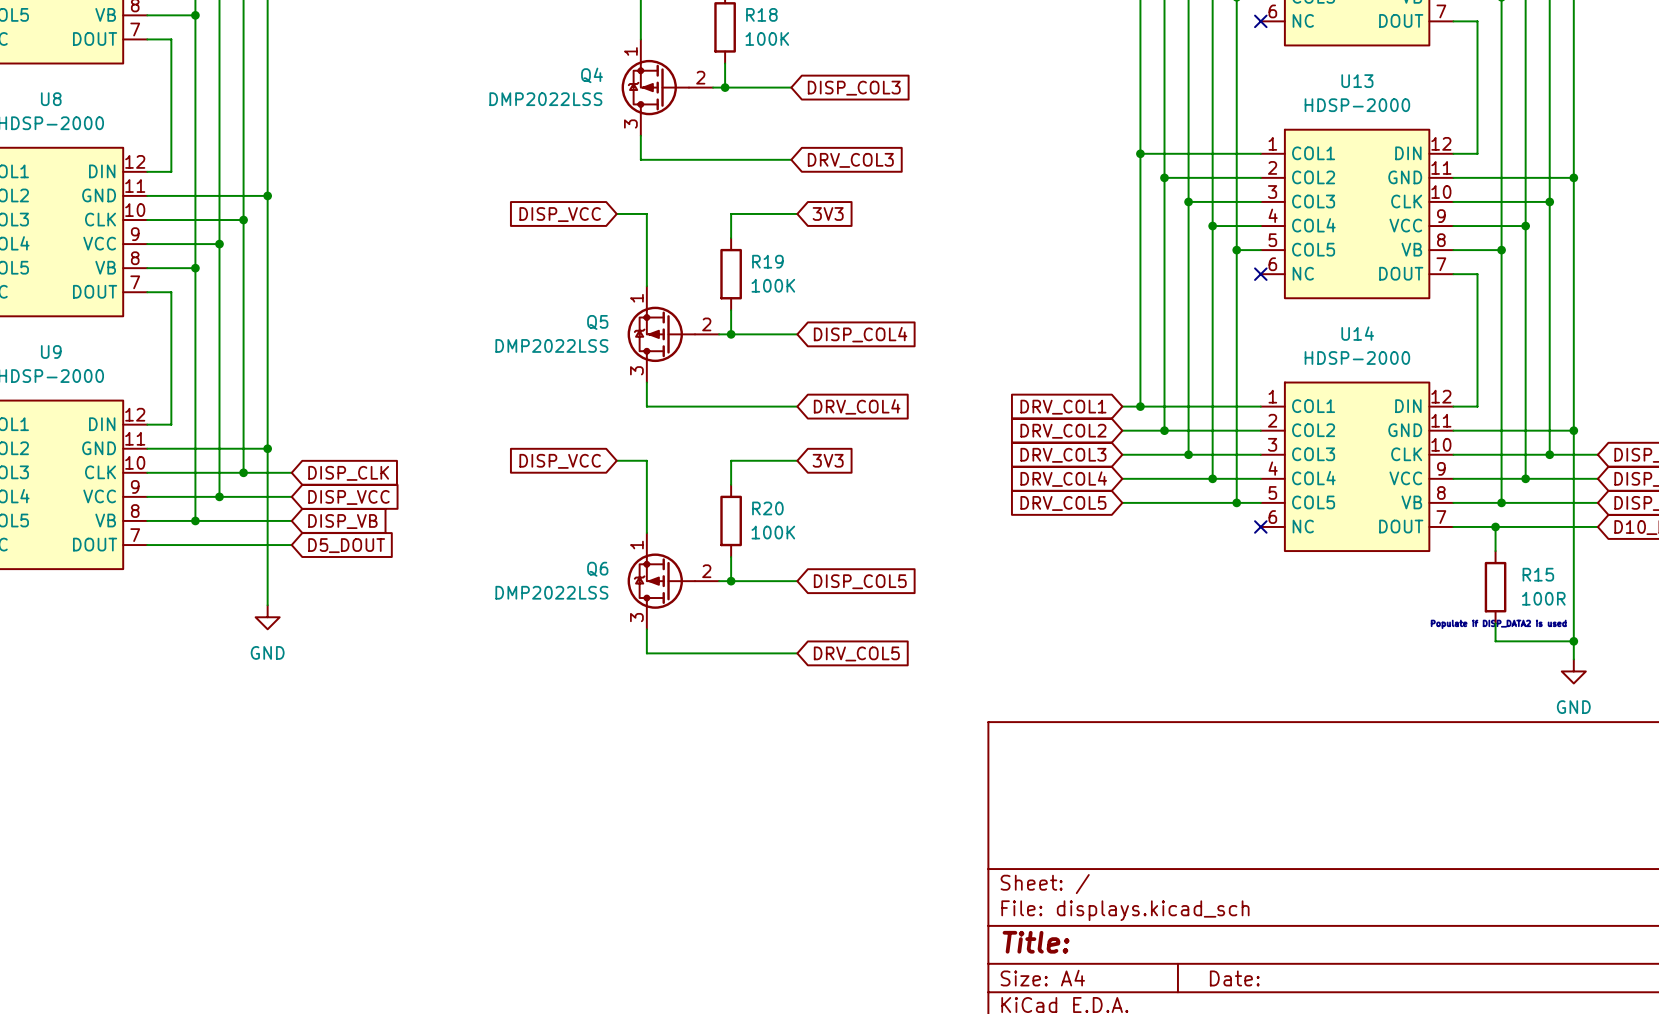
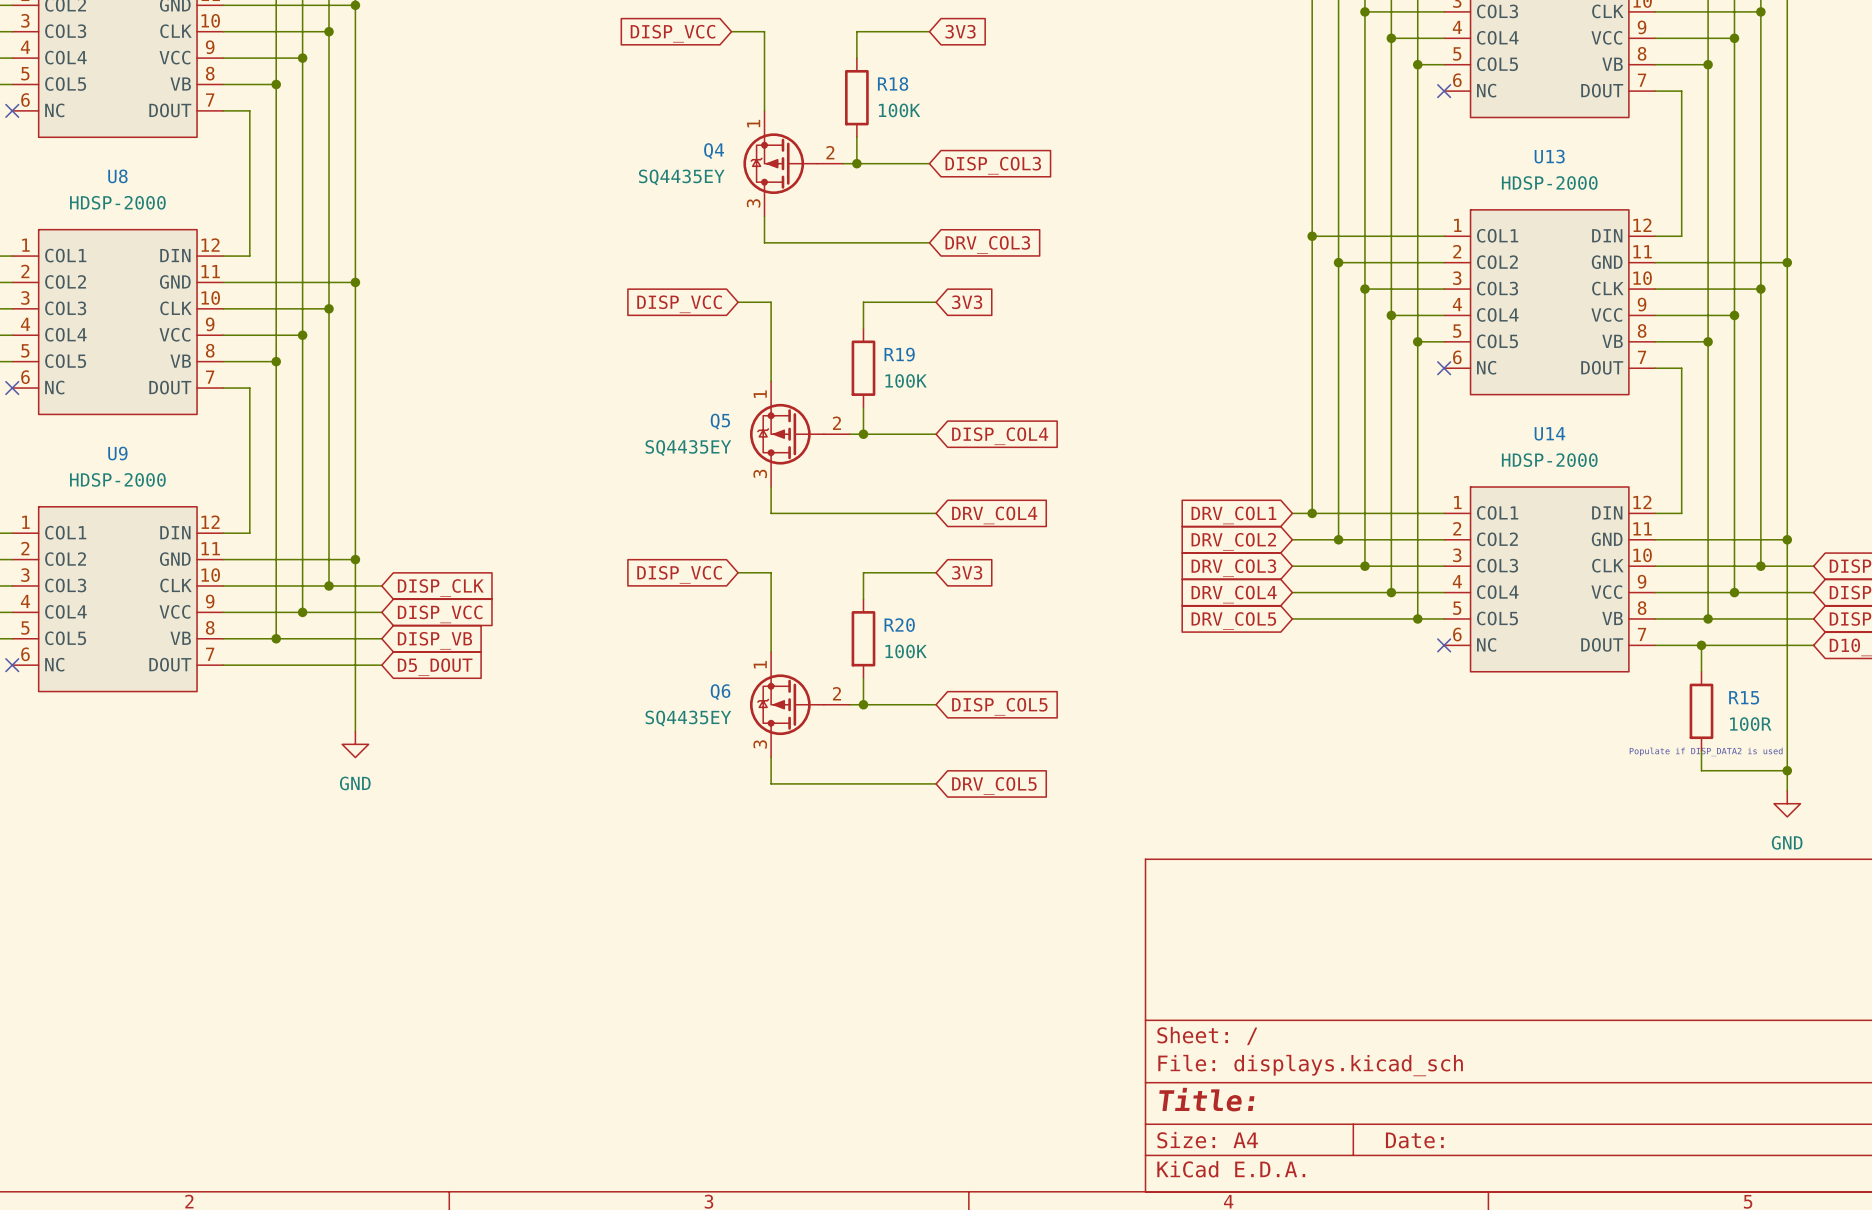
Q4 value: DMP2022LSS (545, 99) -> SQ4435EY (681, 177)
Q5 value: DMP2022LSS (551, 345) -> SQ4435EY (688, 447)
Q6 value: DMP2022LSS (551, 592) -> SQ4435EY (688, 718)

